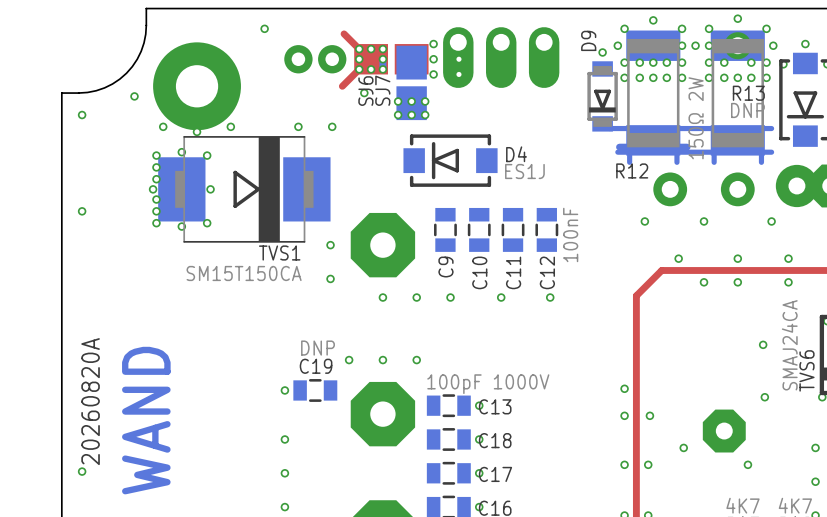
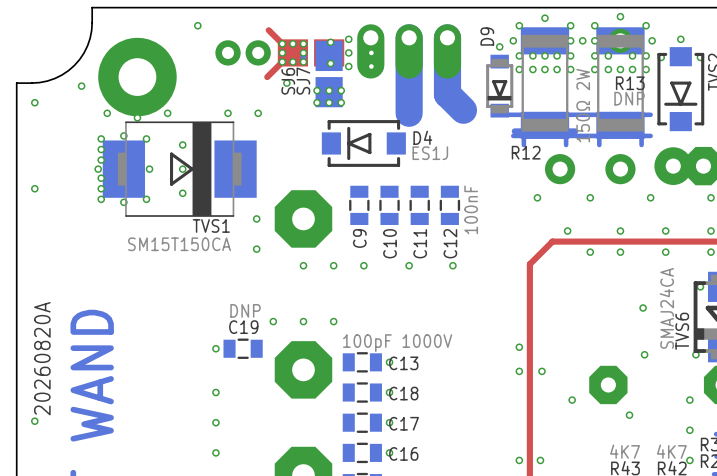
bottom track: none -> (409, 37) (409, 113)
bottom track: none -> (447, 37) (447, 94) (463, 110)
via: none -> (330, 42)
via: none -> (330, 63)
via: none -> (182, 144)
via: none -> (182, 169)
via: none -> (182, 193)
via: (624, 464) -> none
via: (648, 464) -> none

